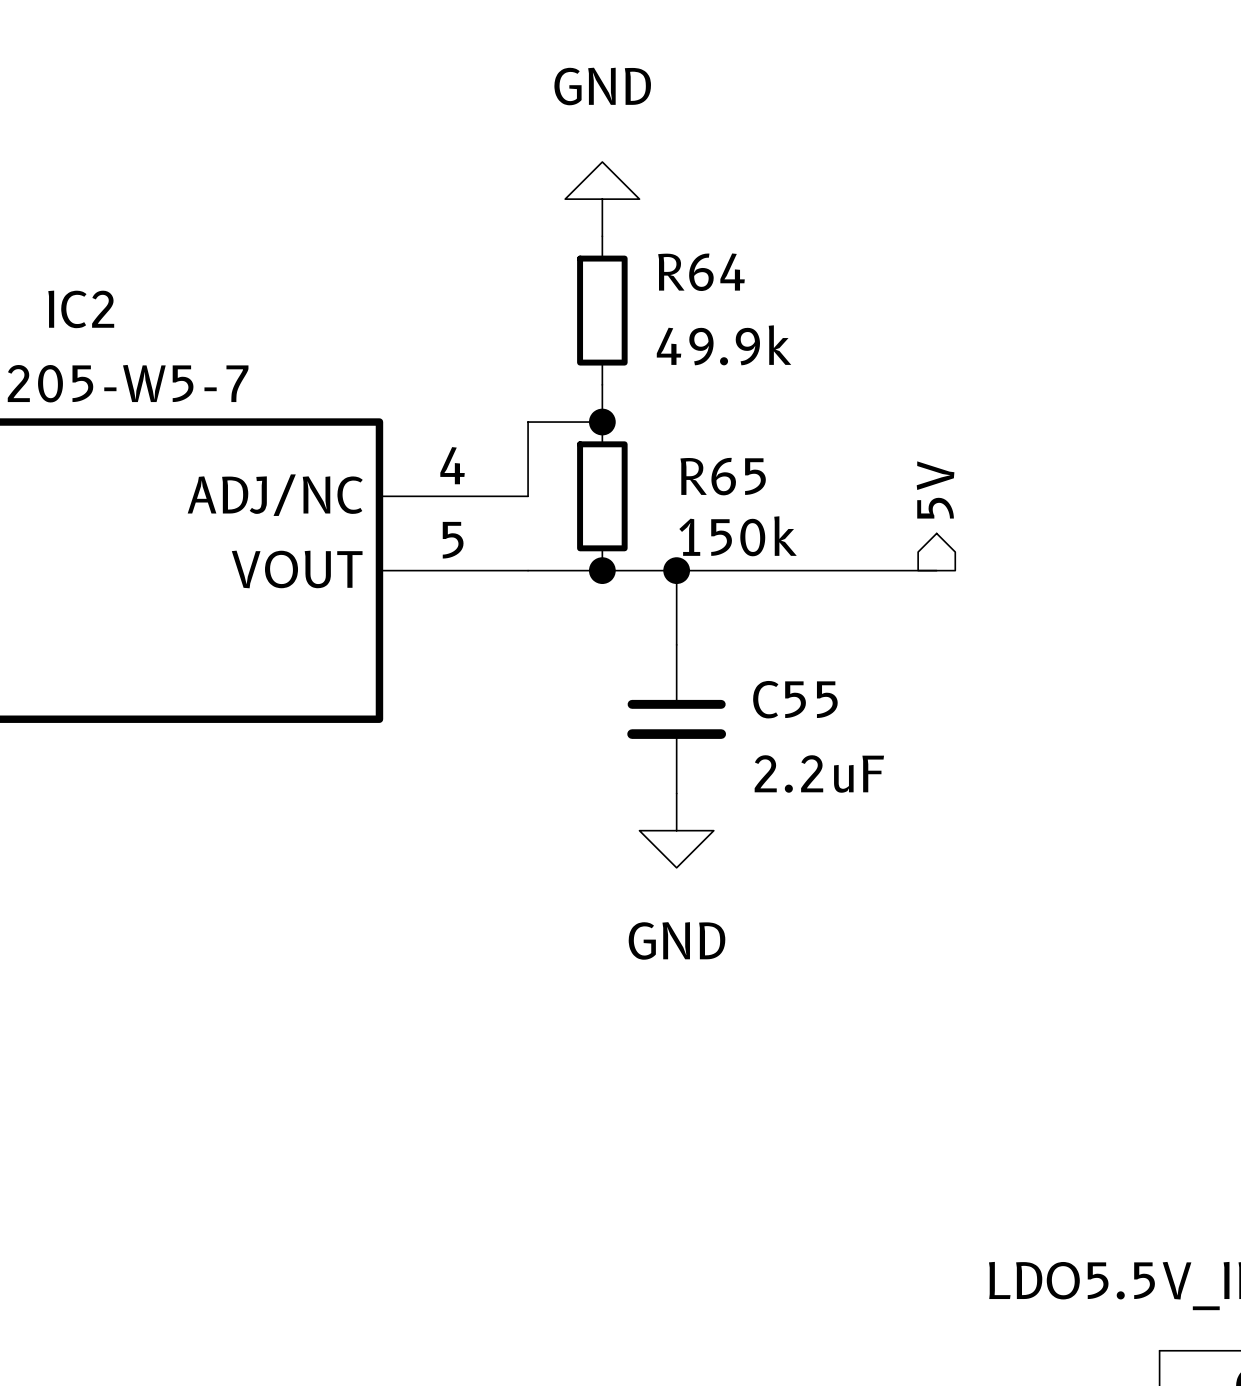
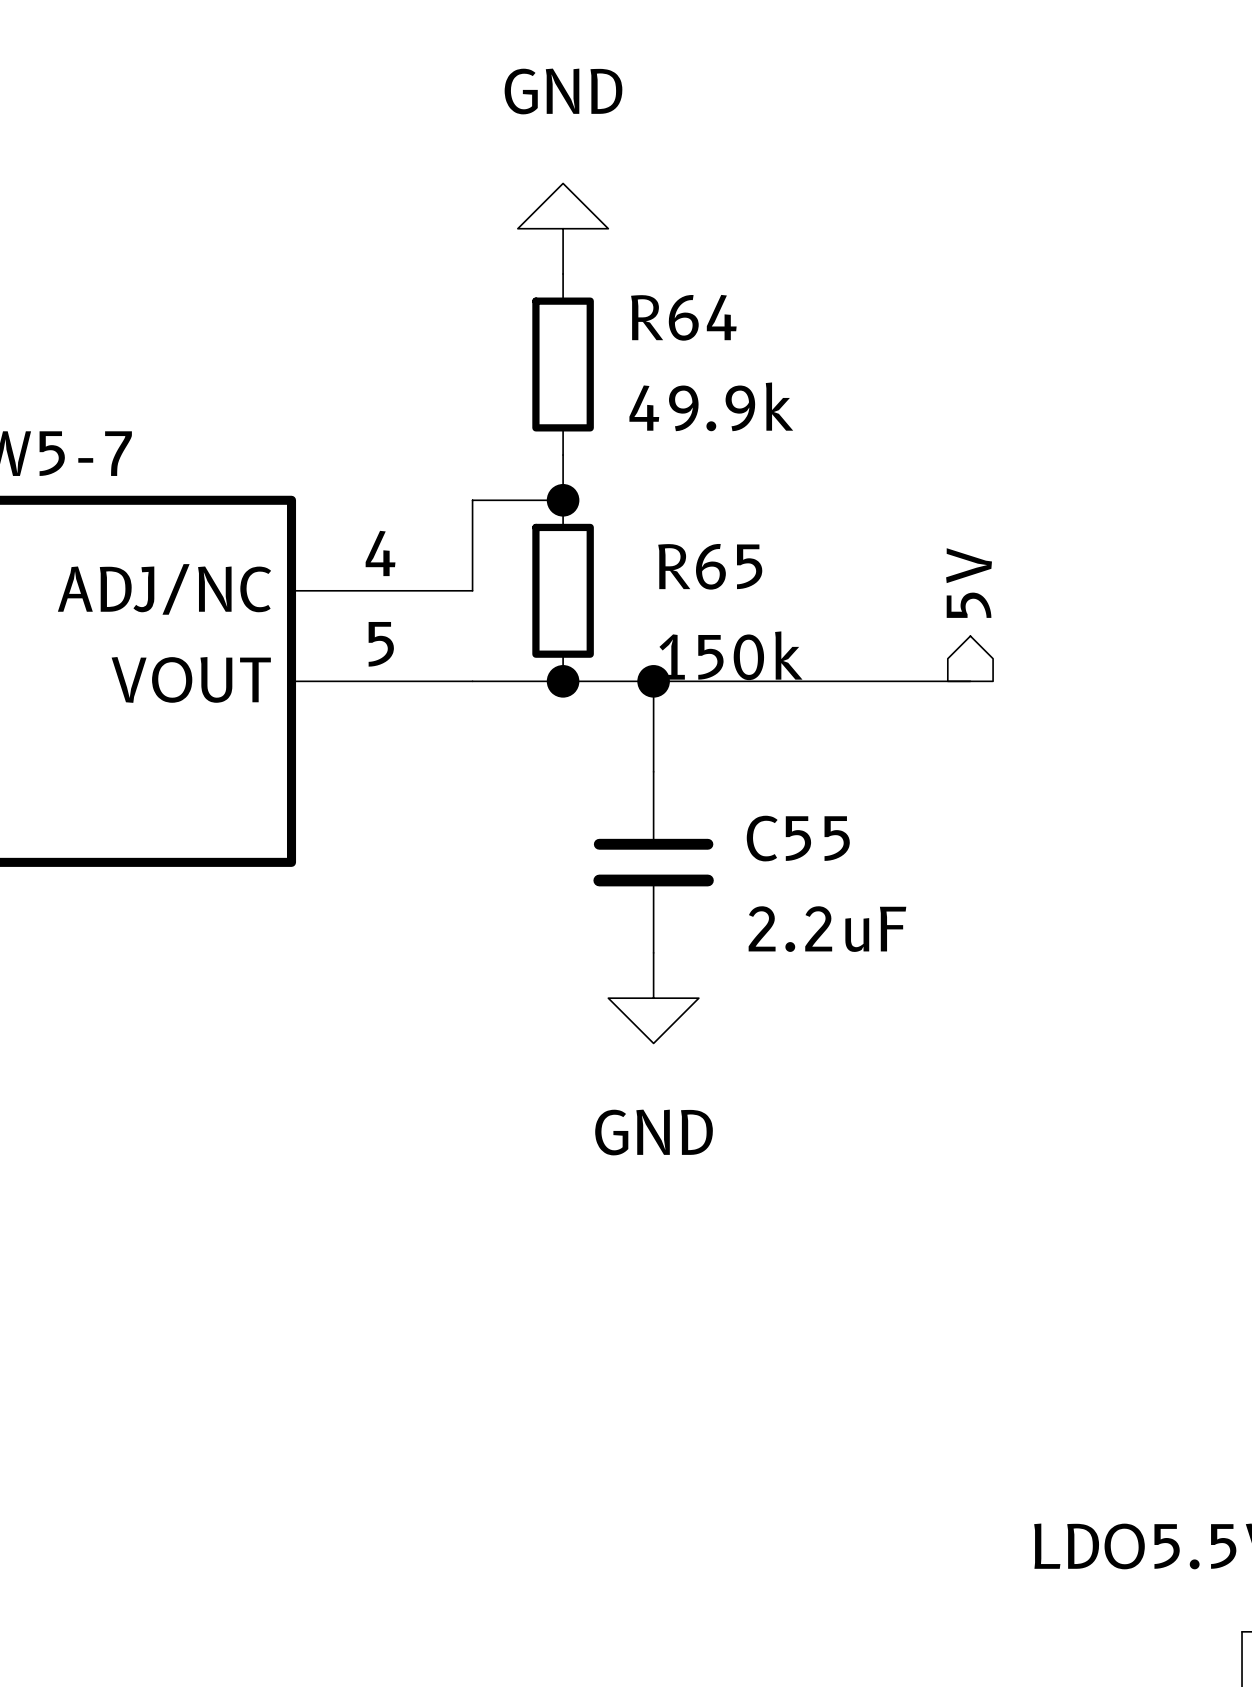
R65 value position: 150k (738, 536) -> 150k (730, 655)

